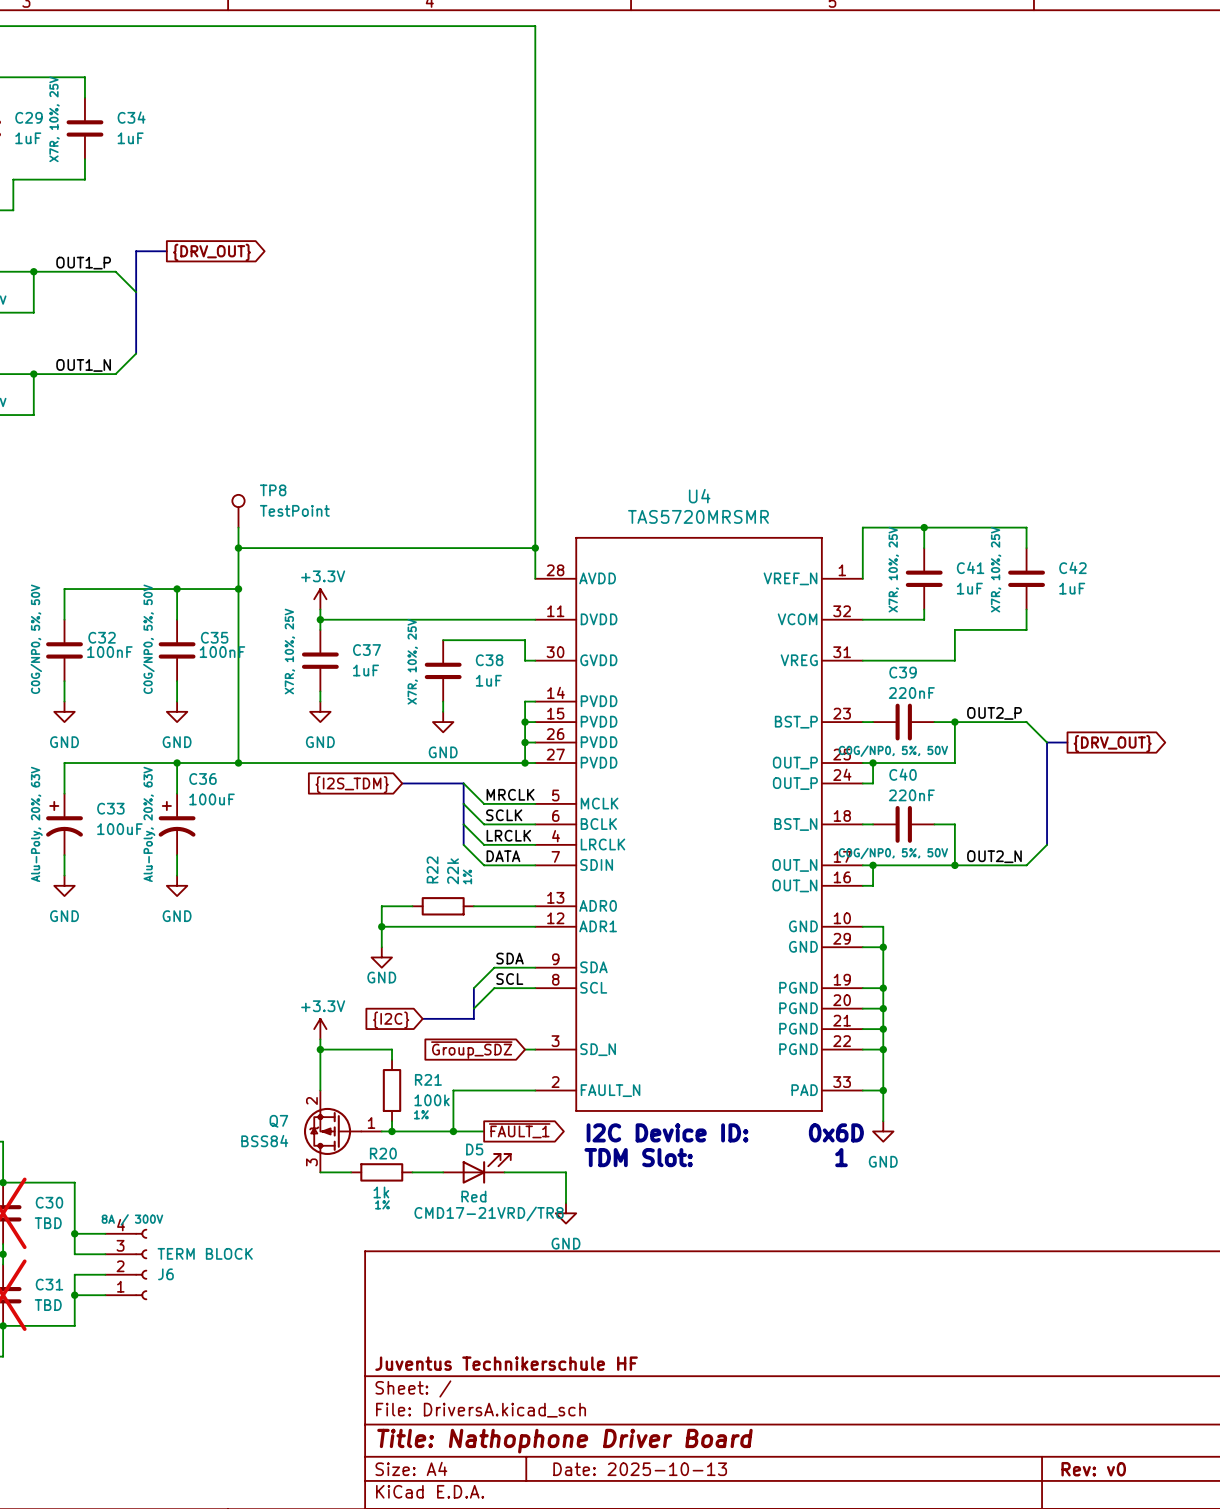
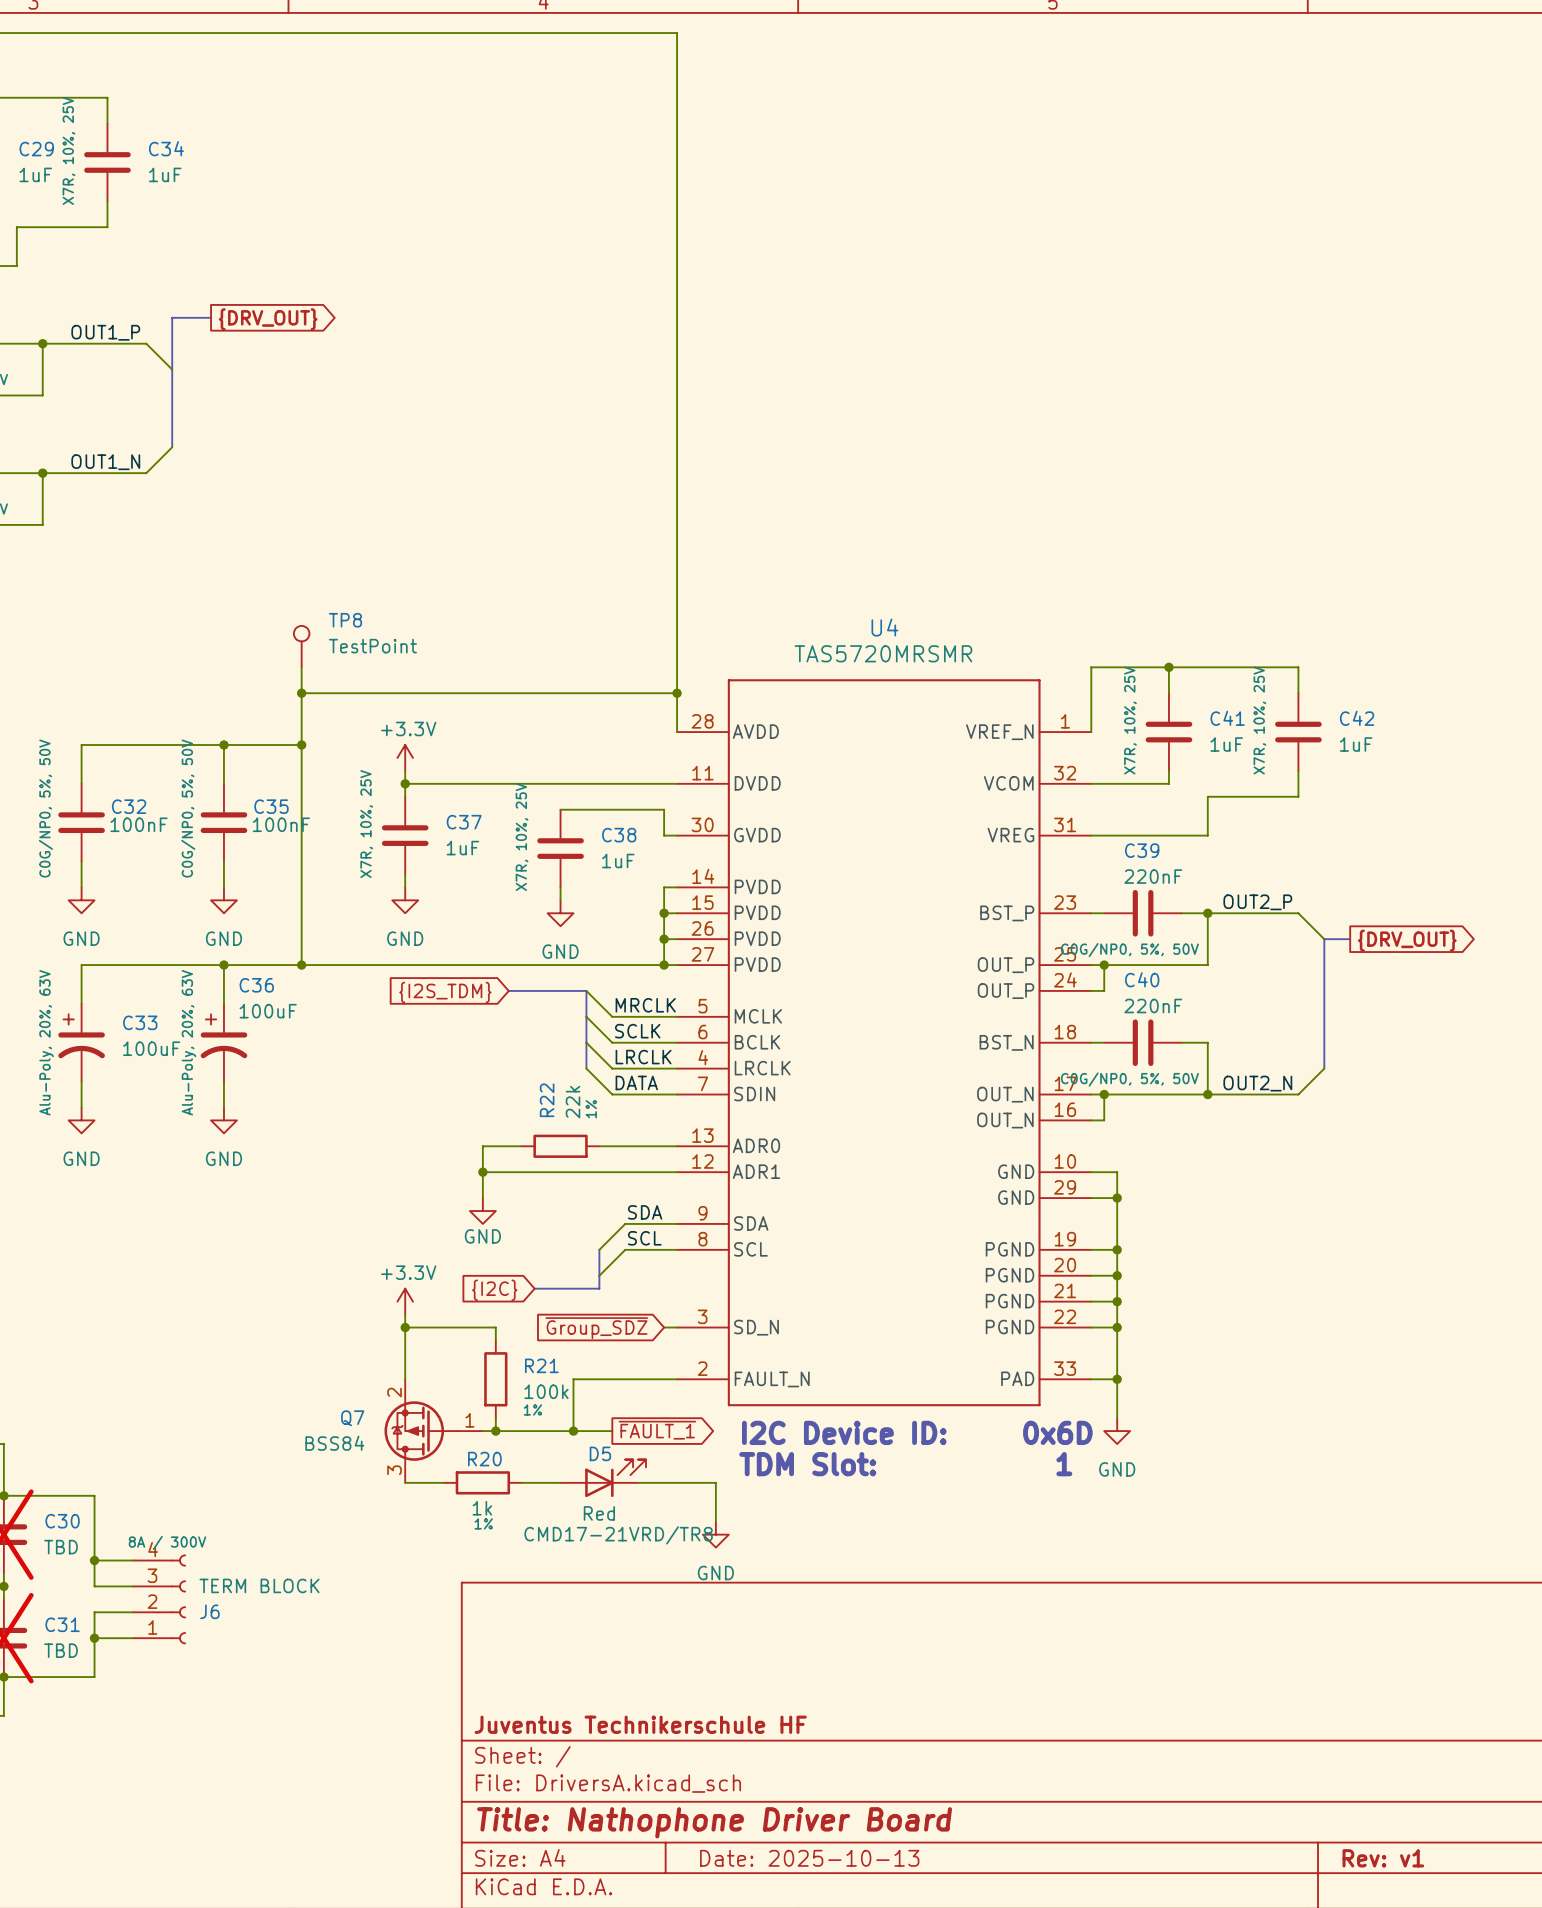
title block: Rev: v0 (1093, 1469) -> Rev: v1 (1383, 1858)

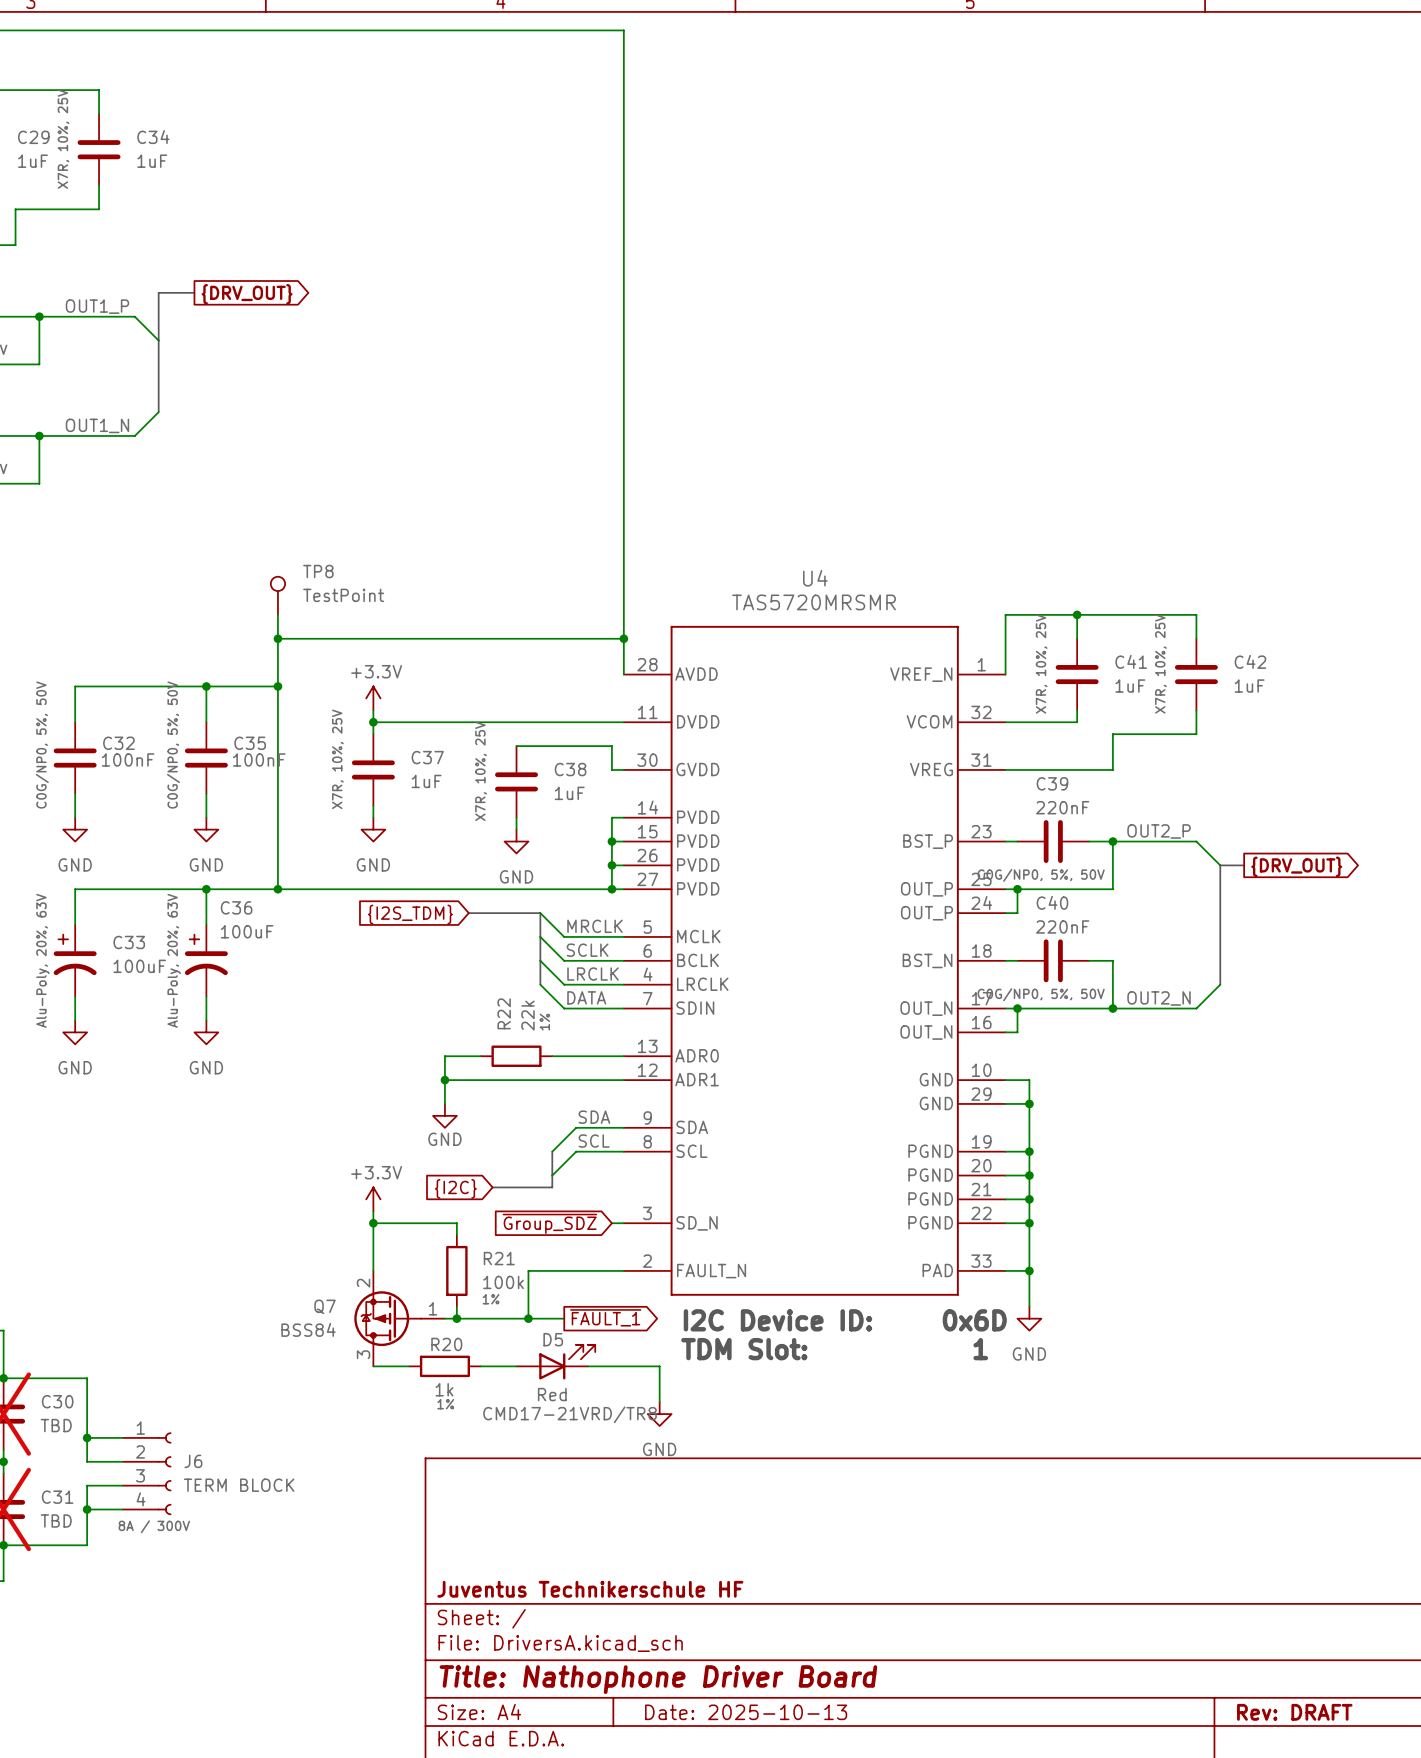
J6 flip: as is (178, 1599) -> up-down (164, 1473)
title block: Rev: v1 (1383, 1858) -> Rev: DRAFT (1294, 1712)

